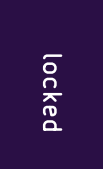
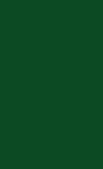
text: locked (52, 92) -> none

